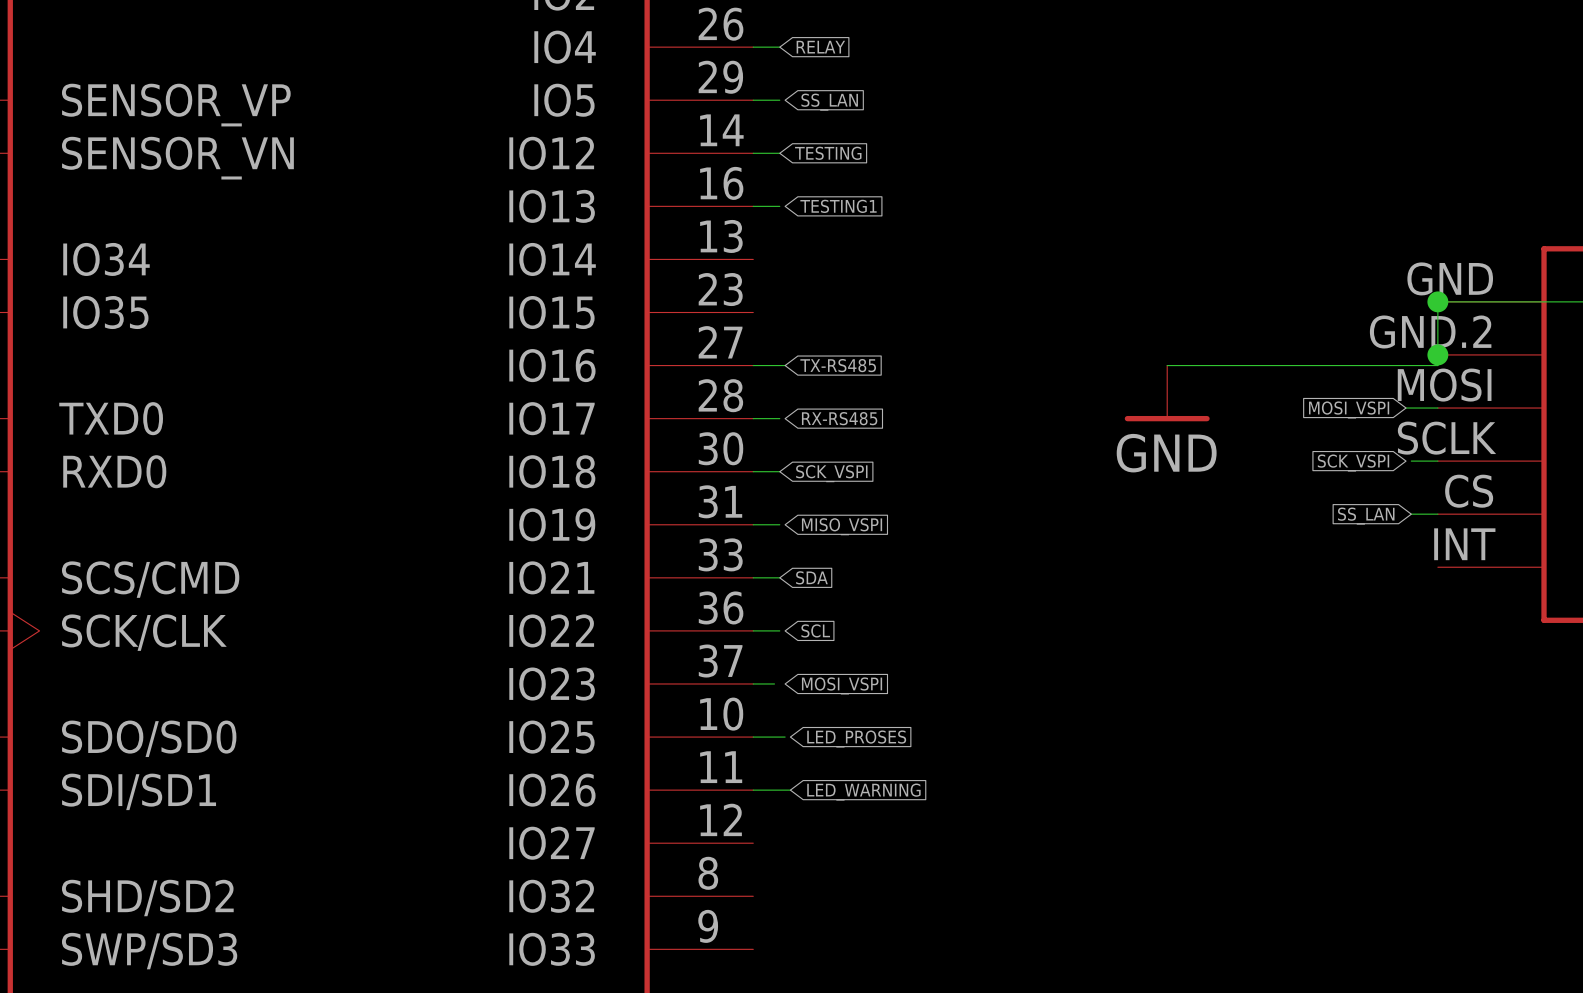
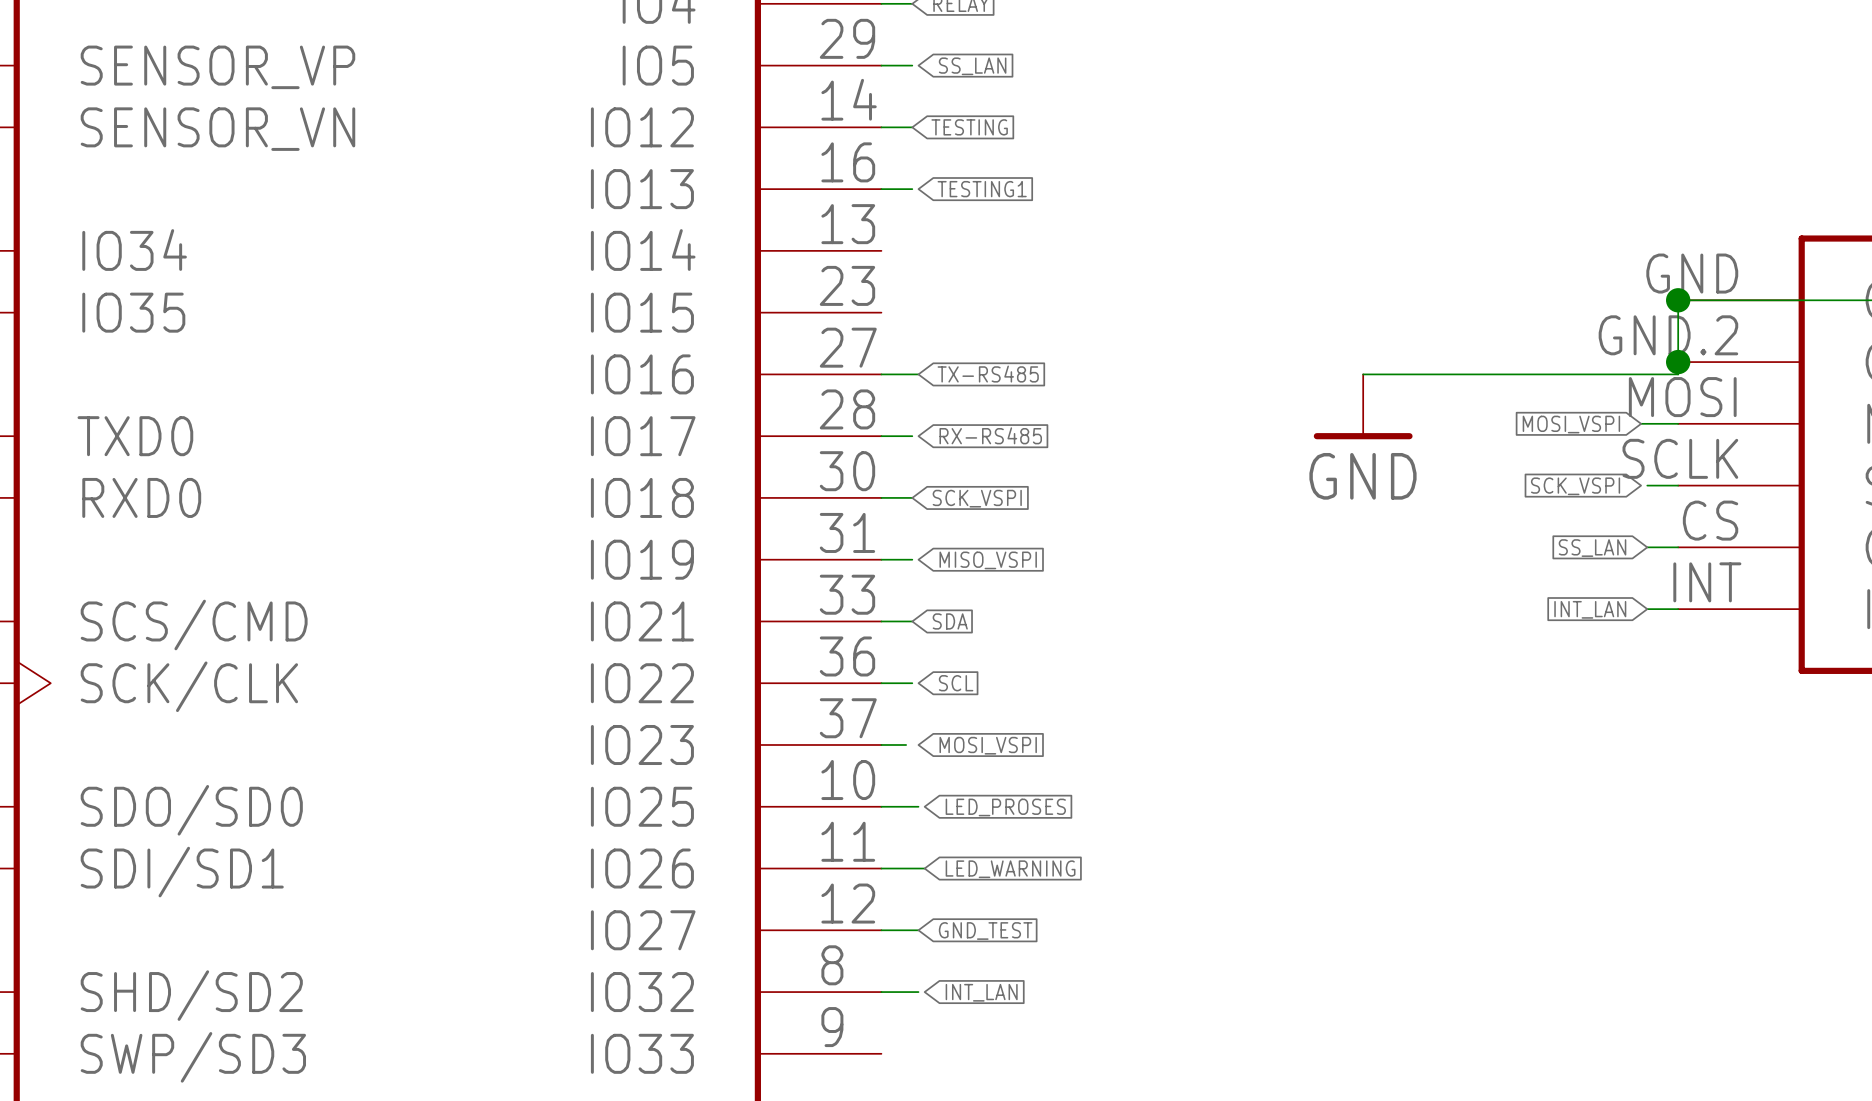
wire: none -> (1647, 609) (1678, 609)
global label: none -> INT_LAN (1590, 609)
wire: none -> (881, 930) (918, 930)
global label: none -> GND_TEST (985, 930)
wire: none -> (881, 992) (918, 992)
global label: none -> INT_LAN (981, 992)

